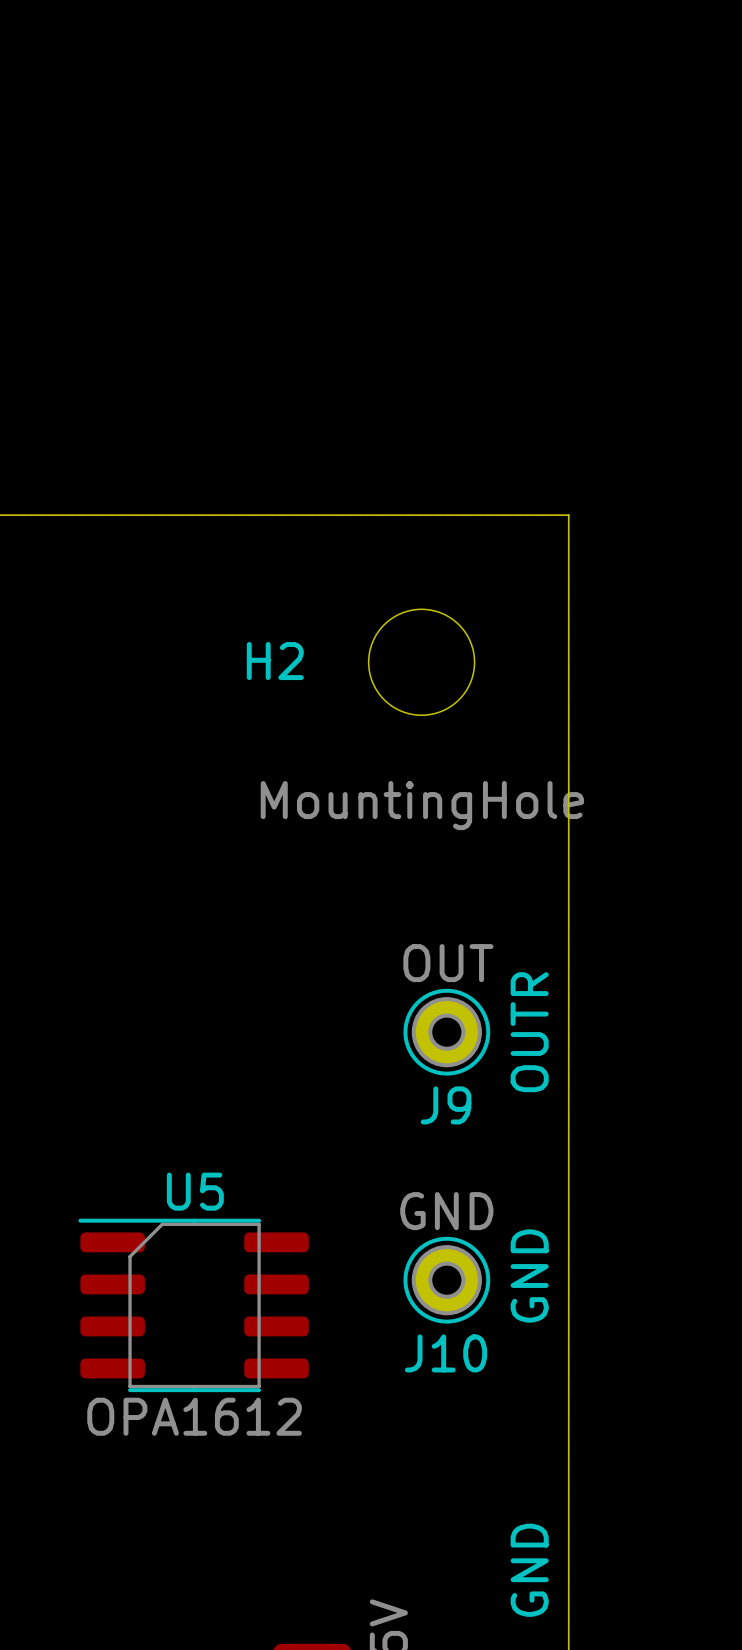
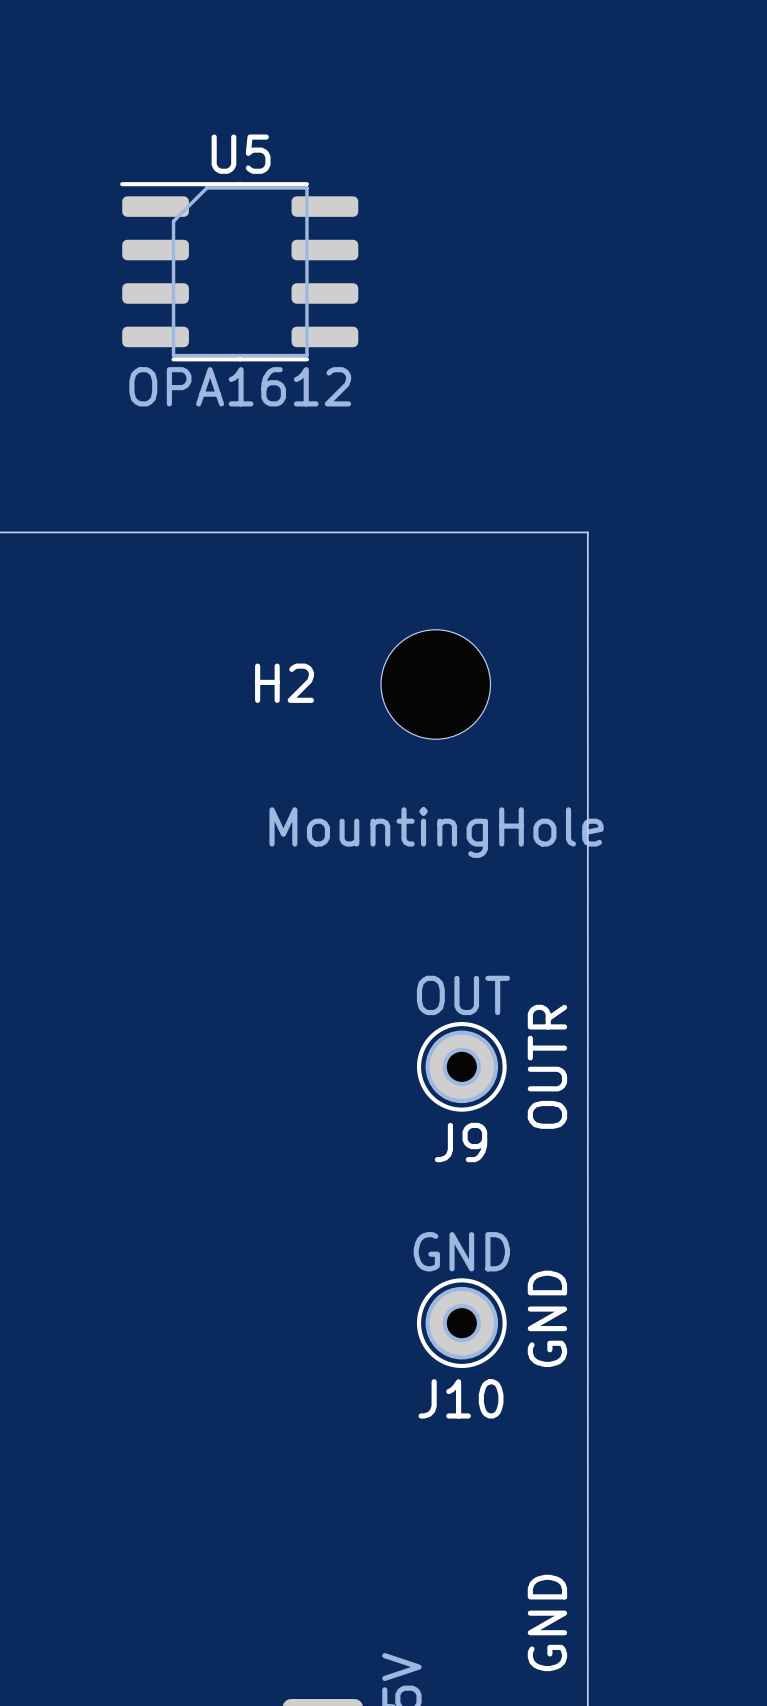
U5 position: (193, 1305) -> (239, 271)

